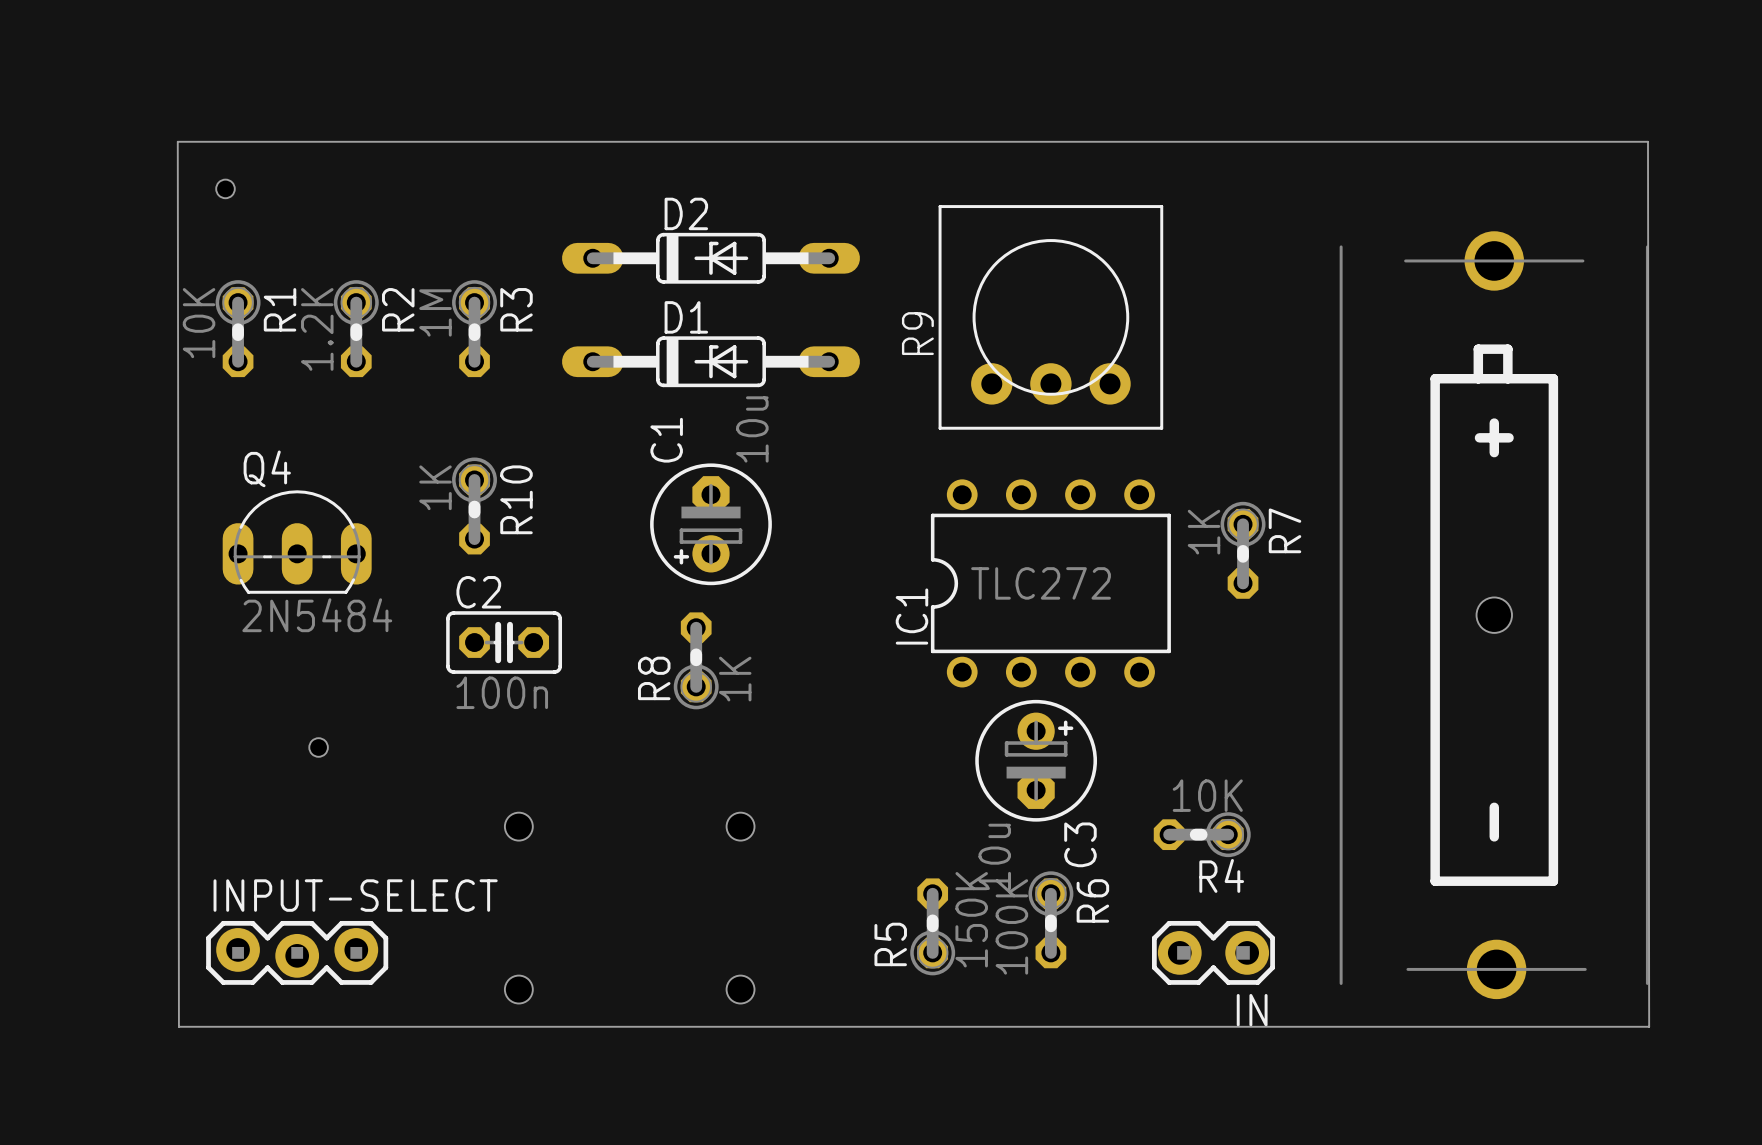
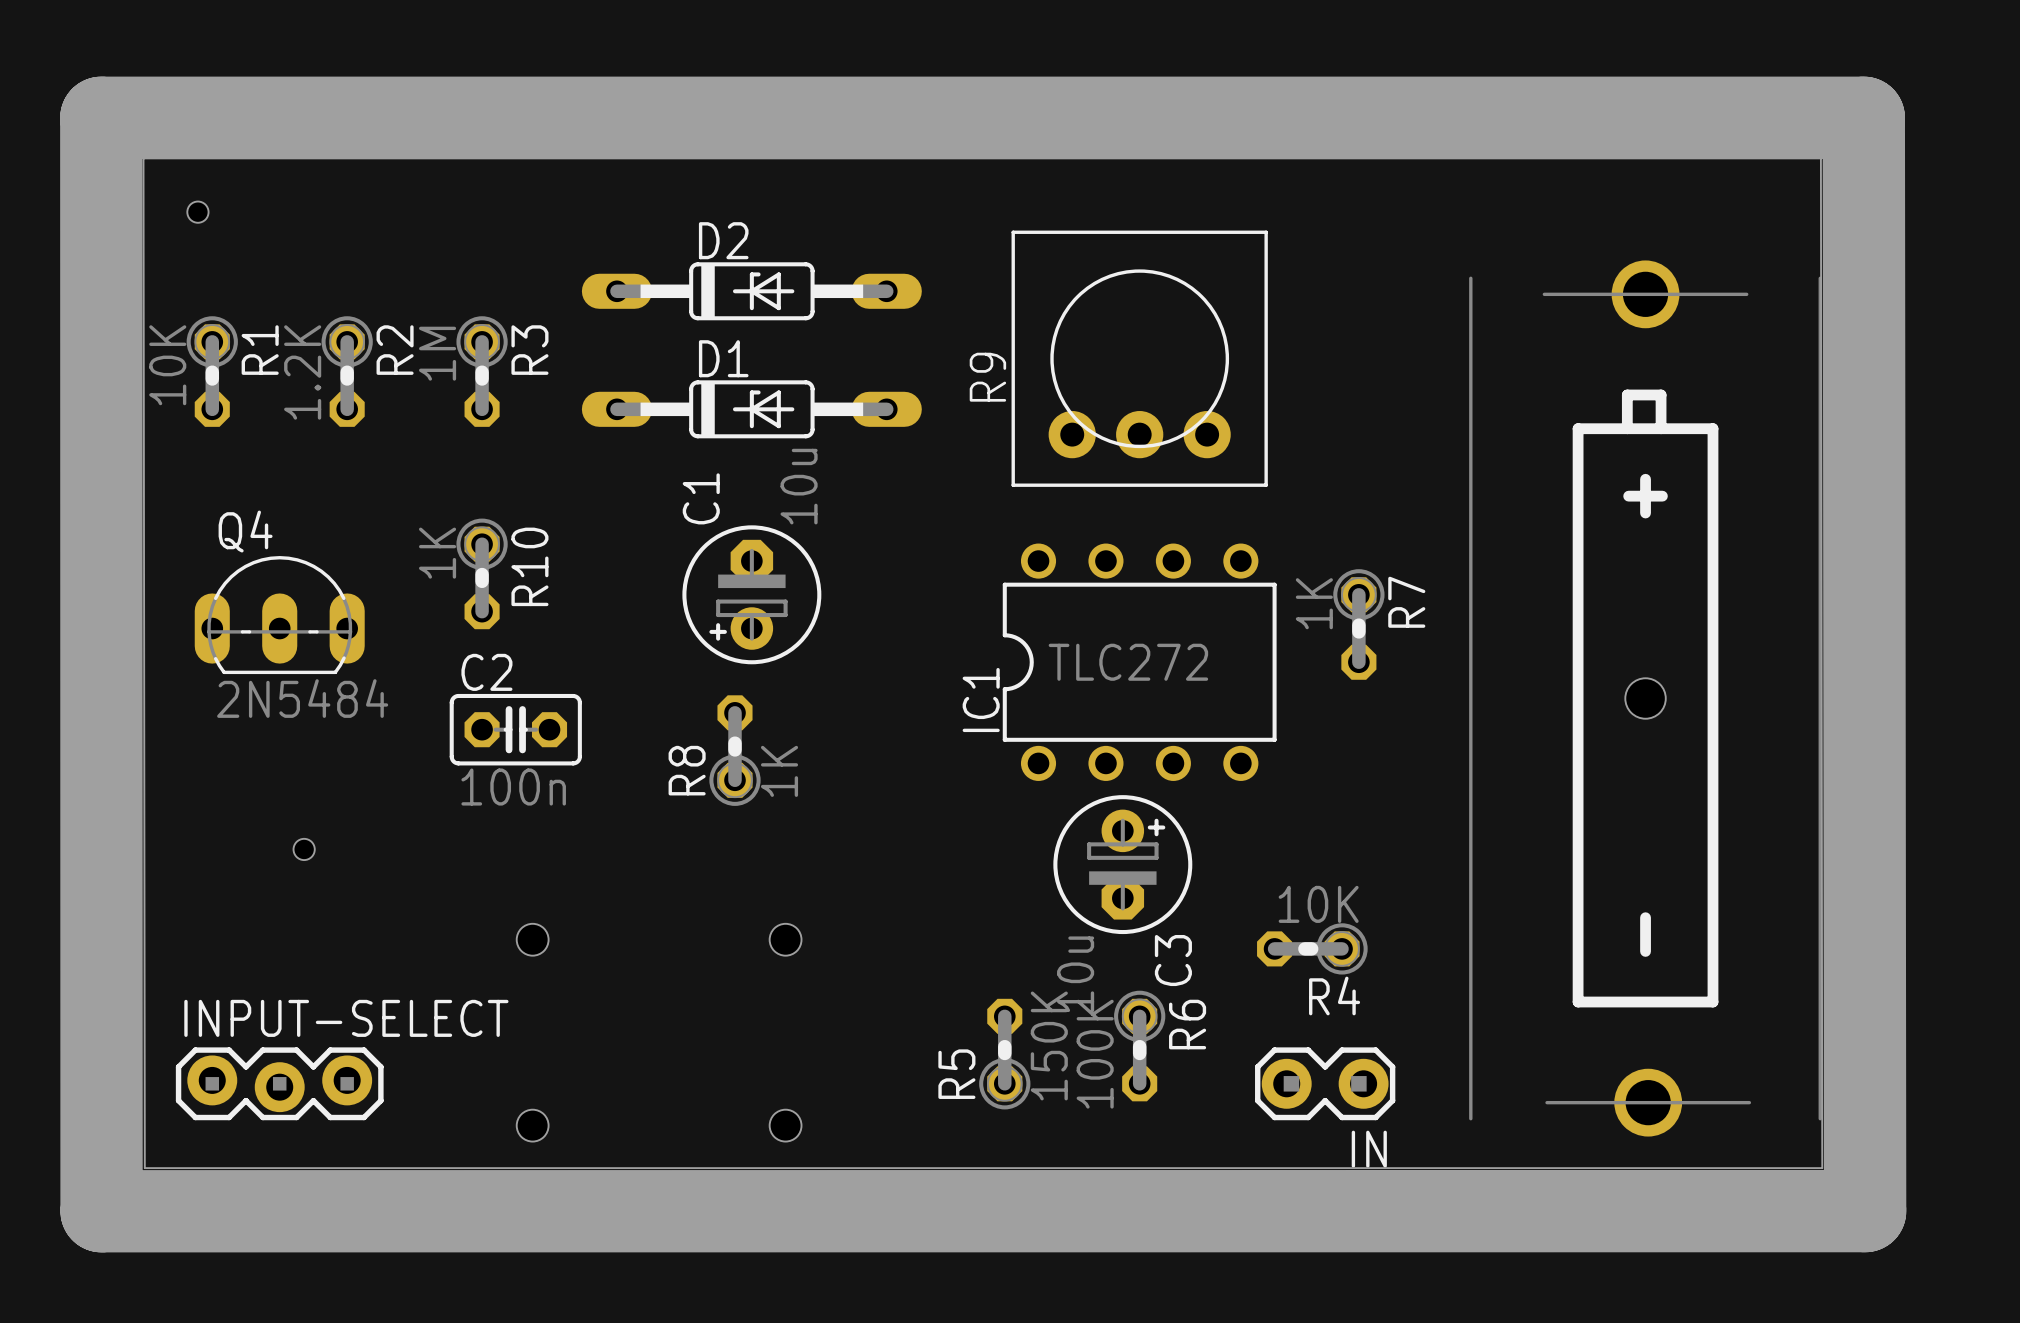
board edge: none -> (101, 117) (1863, 117) (1865, 1211) (101, 1211) (101, 117)

